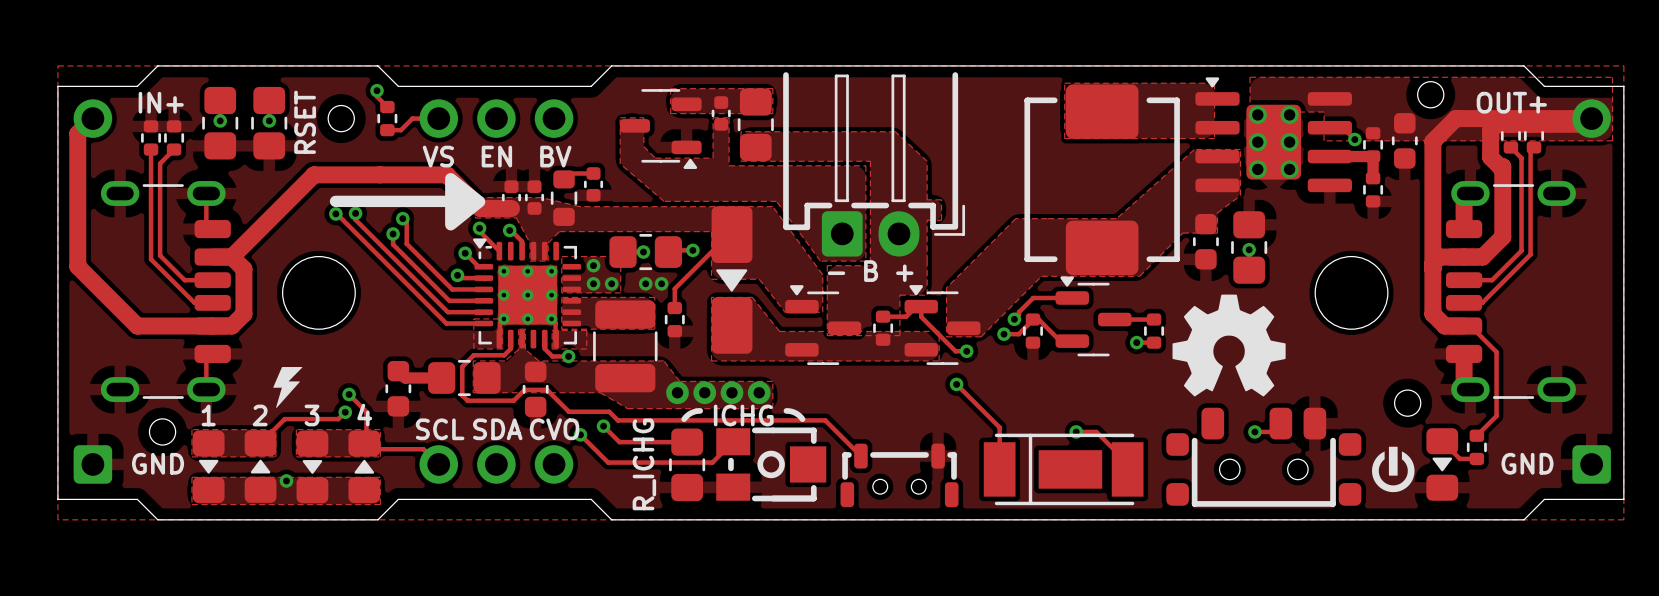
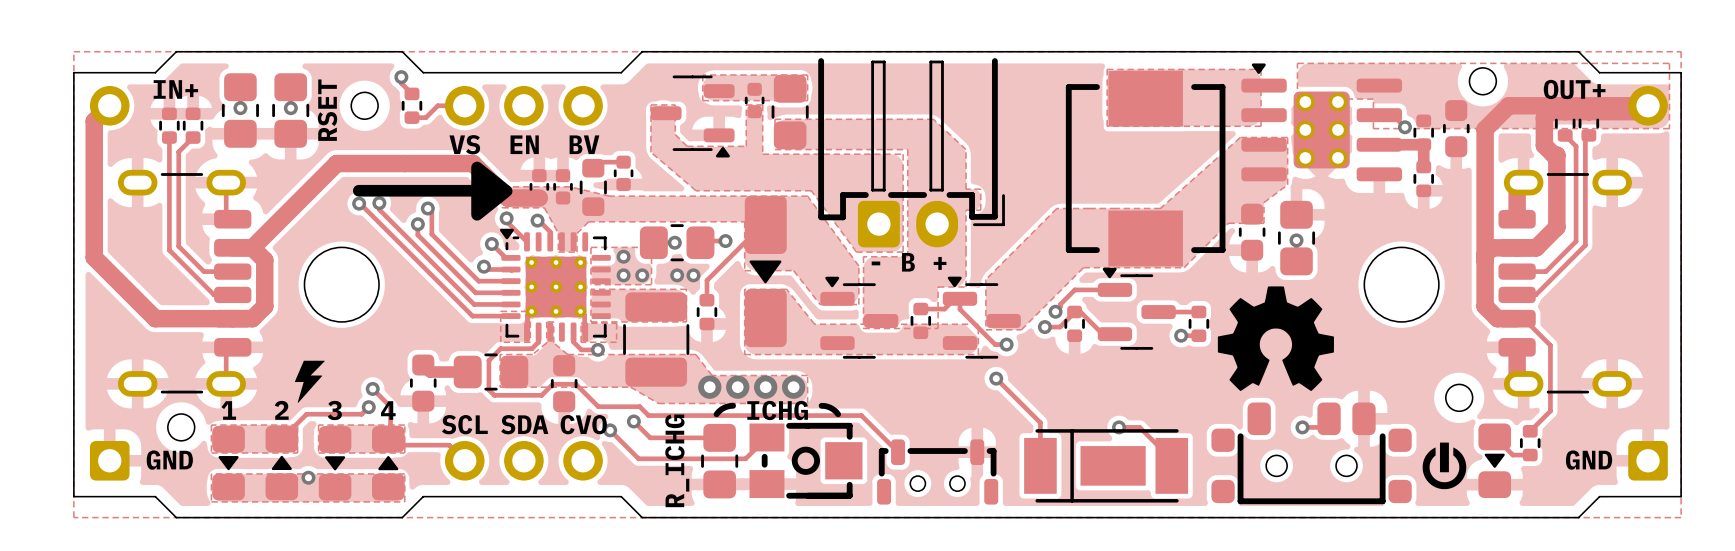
part footprint: [1024, 84, 1180, 276] -> [1065, 70, 1226, 267]

